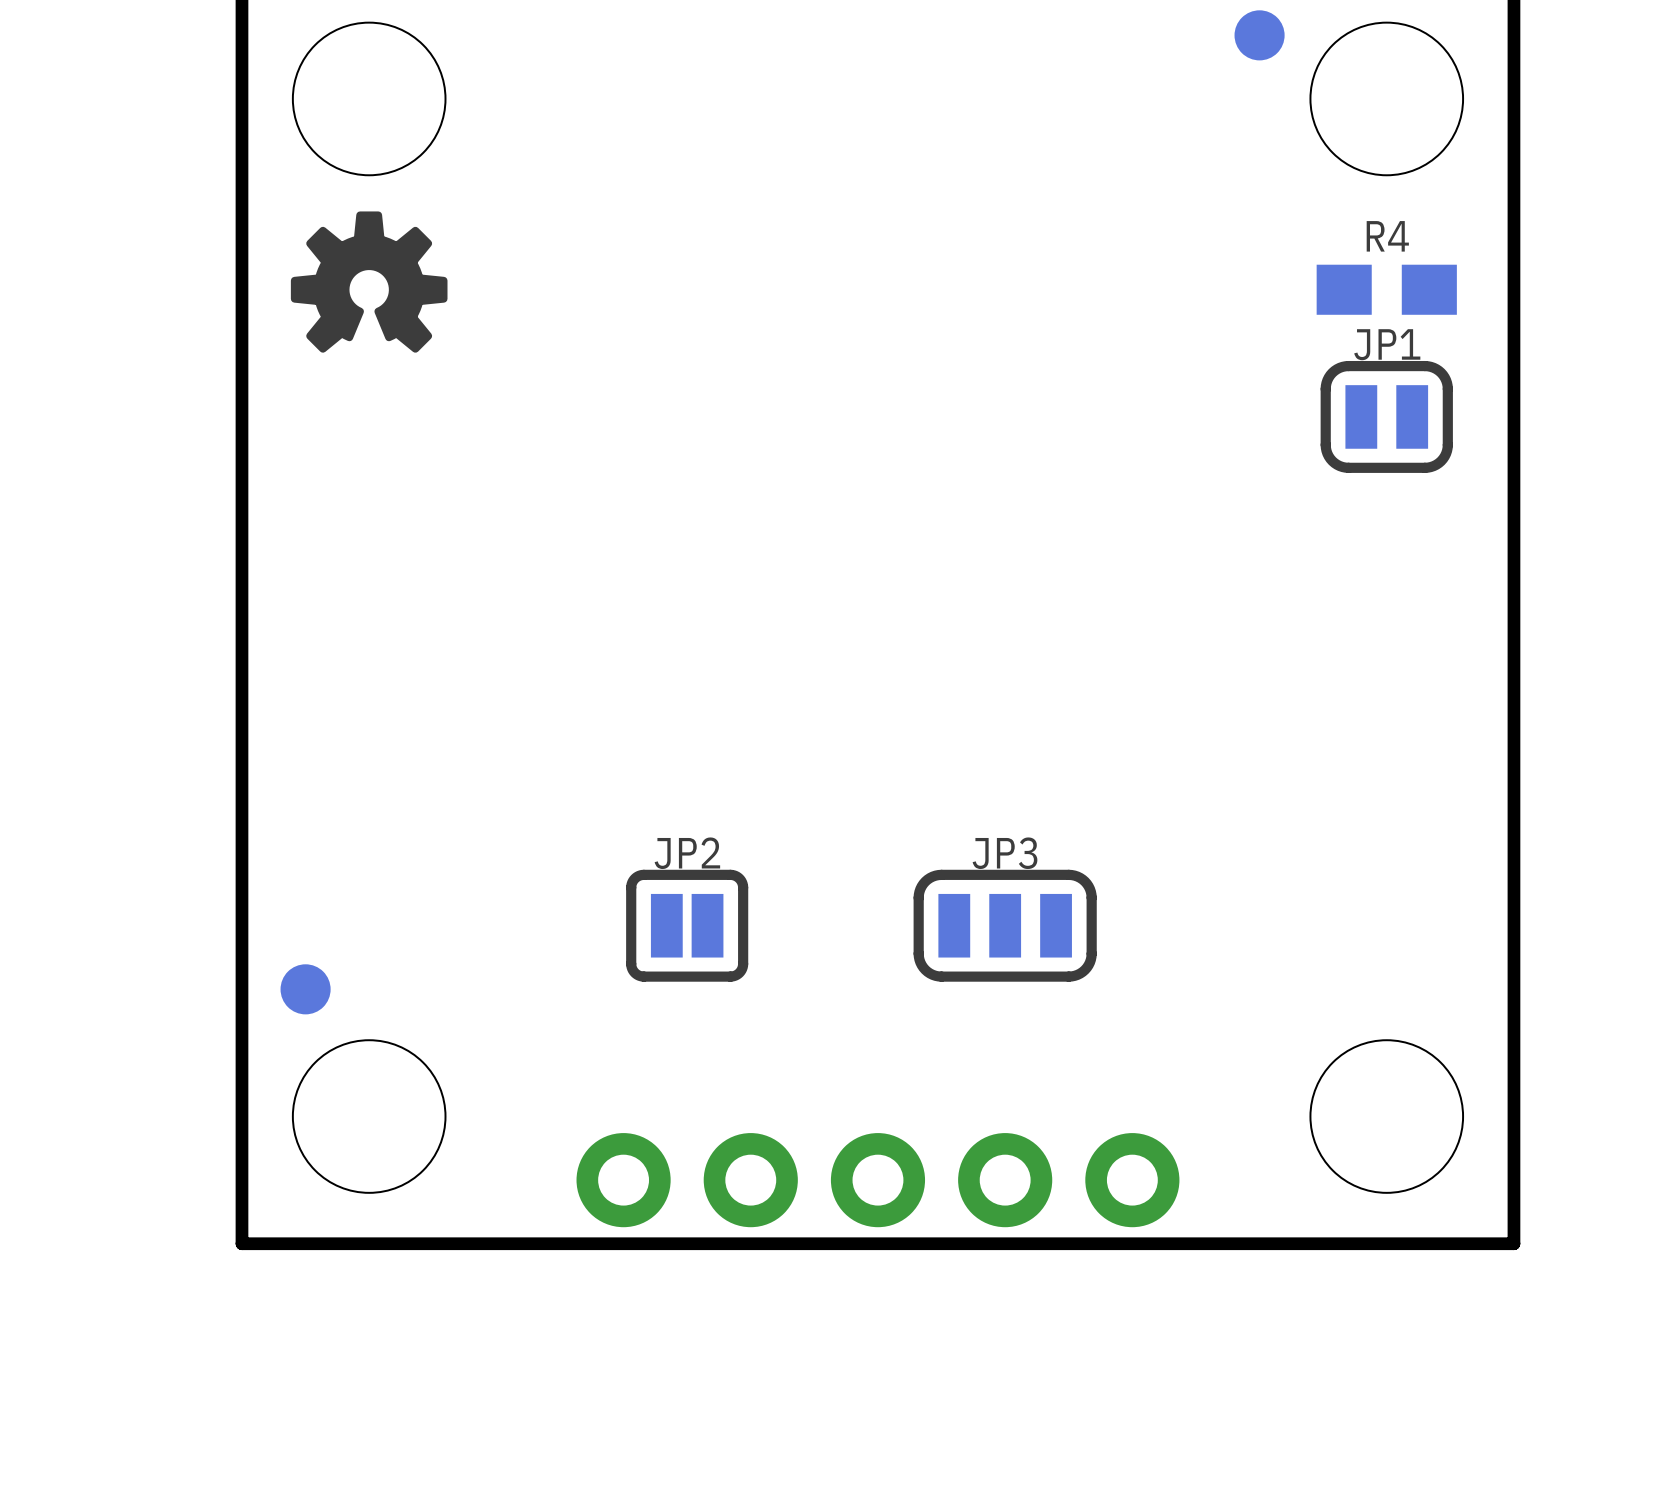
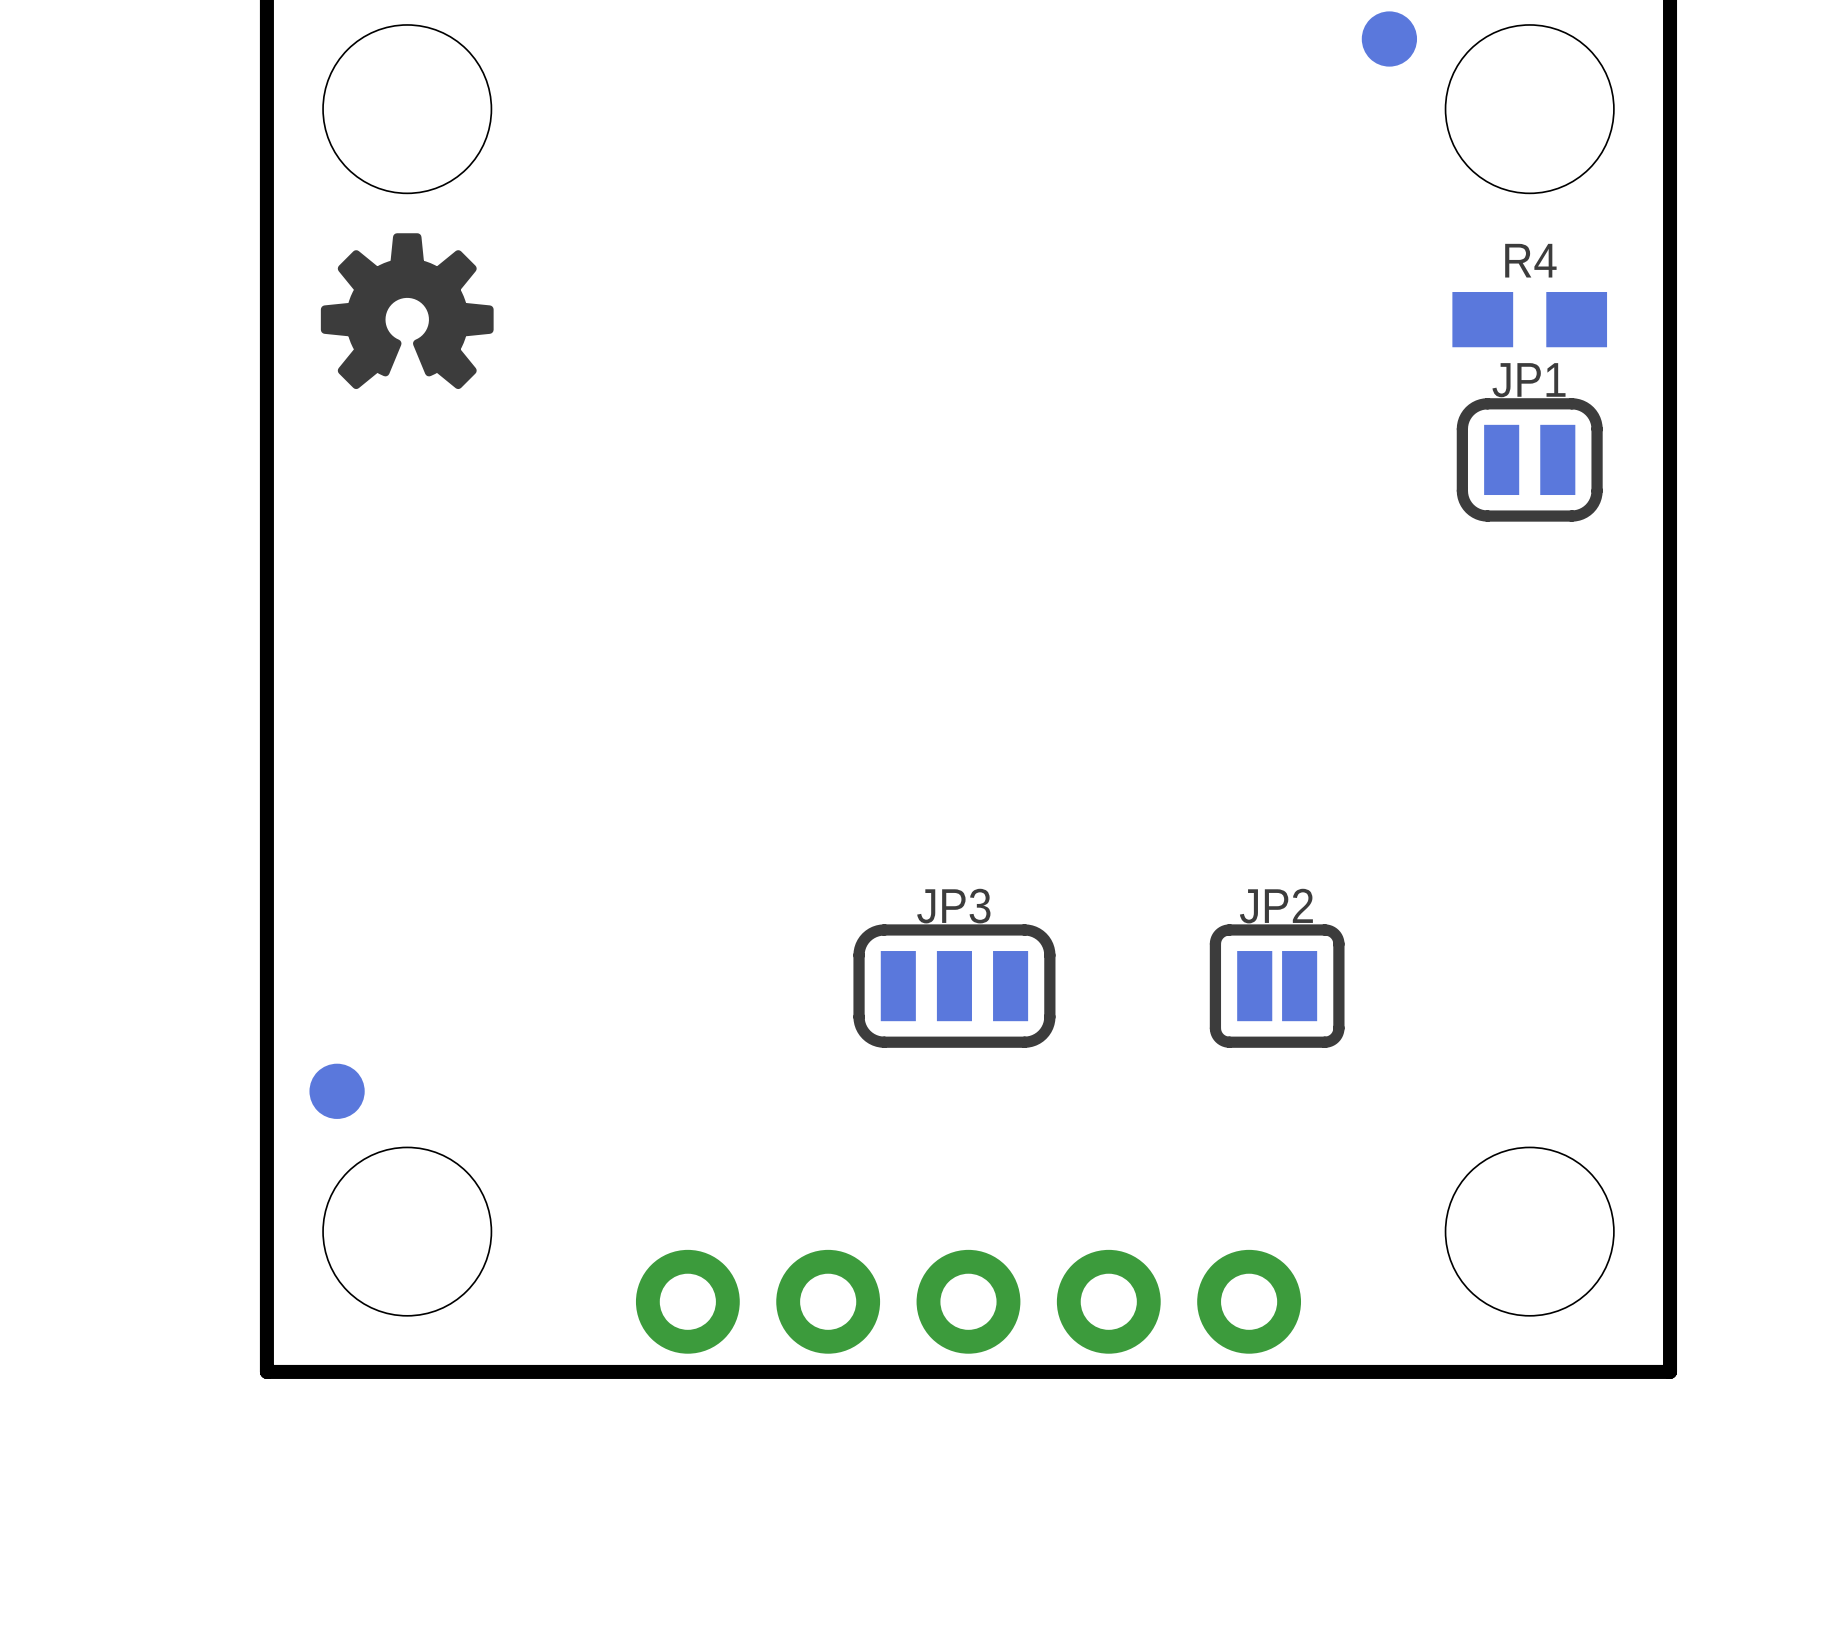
JP2 position: (687, 925) -> (1277, 986)
JP3 position: (1005, 925) -> (954, 986)

